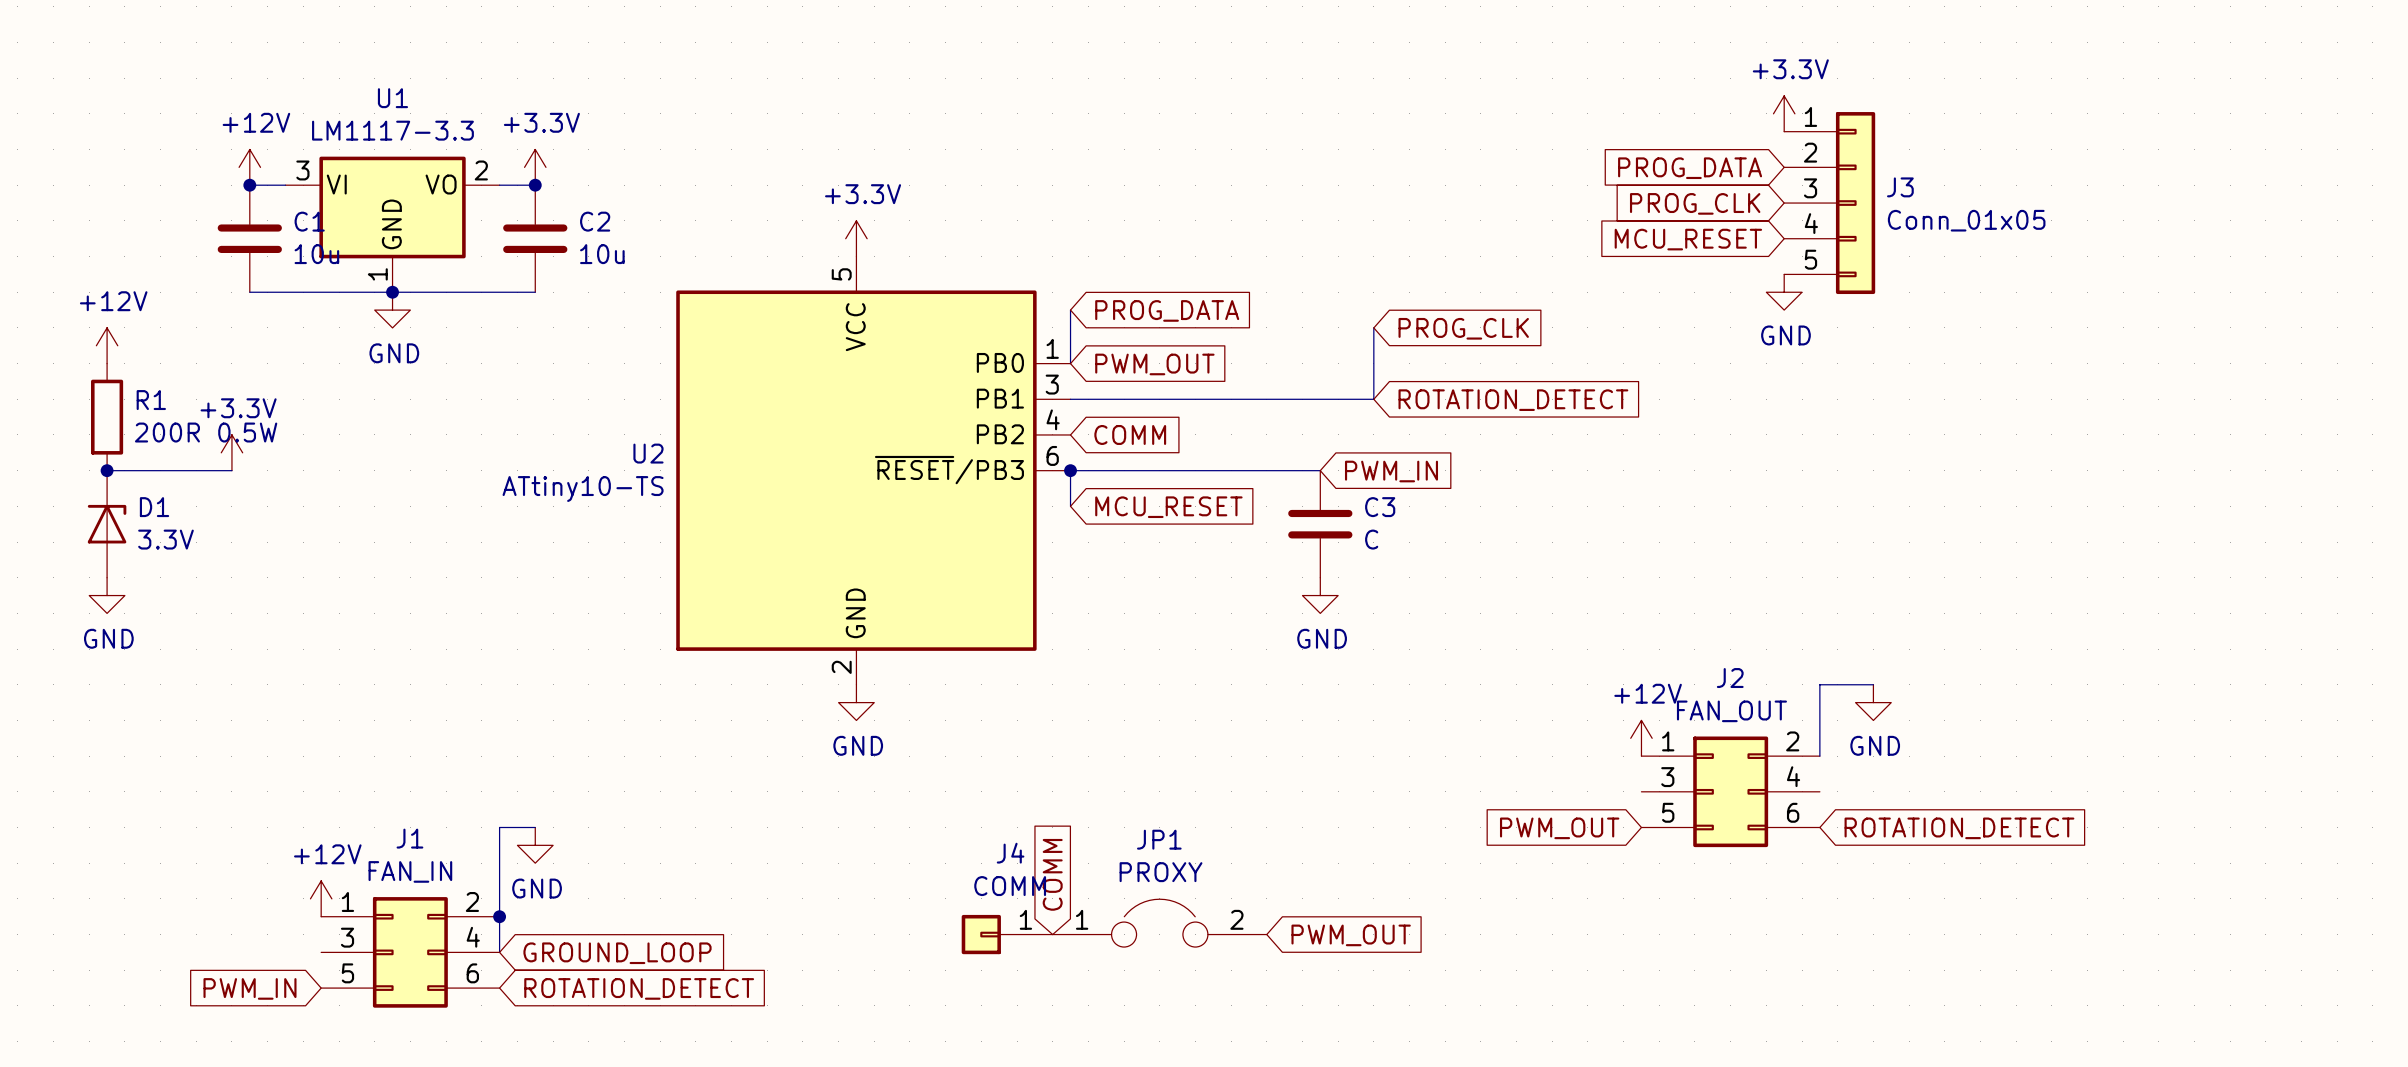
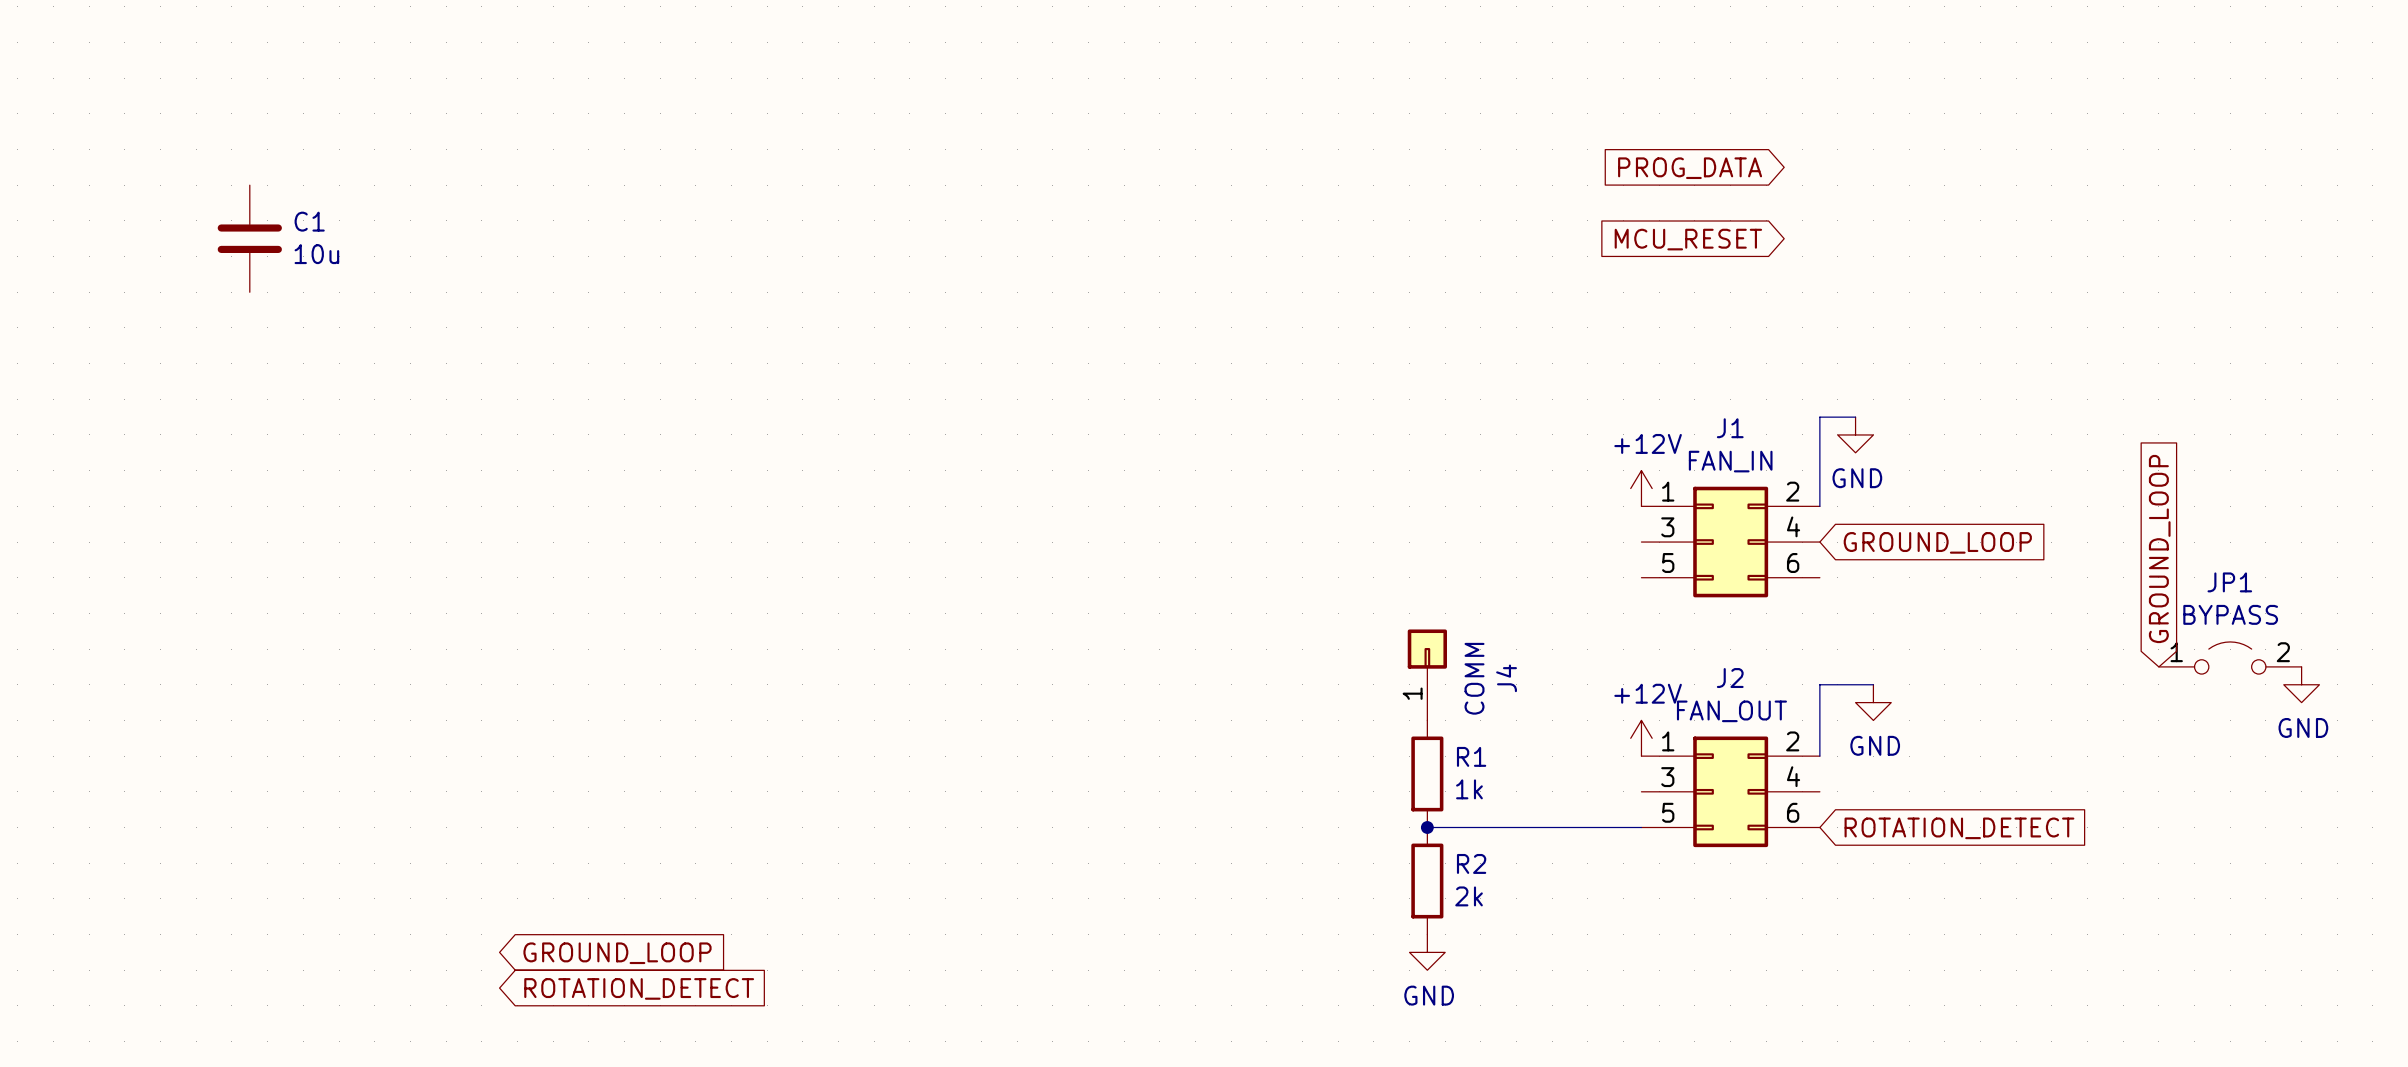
power symbol: +3.3V (1784, 113) -> none
power symbol: +12V (249, 167) -> none
power symbol: +3.3V (535, 167) -> none
wire: (249, 185) (285, 185) -> none
junction: (249, 185) -> none
wire: (499, 185) (535, 185) -> none
junction: (535, 185) -> none
global label: PROG_CLK (1695, 203) -> none
J3: Conn_01x05 (1829, 203) -> none
U1: LM1117-3.3 (392, 224) -> none
C2: 10u (535, 238) -> none
power symbol: +3.3V (856, 238) -> none
wire: (249, 292) (535, 292) -> none
junction: (392, 292) -> none
power symbol position: GND (1784, 292) -> GND (1855, 434)
power symbol: GND (392, 310) -> none
wire: (1070, 310) (1070, 363) -> none
global label: PROG_DATA (1167, 310) -> none
wire: (1373, 327) (1373, 399) (1070, 399) -> none
global label: PROG_CLK (1463, 328) -> none
power symbol: +12V (107, 345) -> none
global label: PWM_OUT (1154, 364) -> none
global label: ROTATION_DETECT (1513, 400) -> none
R1 position: (107, 417) -> (1427, 773)
wire: none -> (1855, 417) (1819, 417) (1819, 506)
R1 value: 200R 0.5W (206, 432) -> 1k (1469, 789)
global label: COMM (1130, 434) -> none
power symbol: +3.3V (231, 452) -> none
wire: (107, 470) (231, 470) -> none
junction: (107, 470) -> none
U2: ATtiny10-TS (873, 470) -> none
junction: (1070, 470) -> none
wire: (1320, 470) (1070, 470) (1070, 506) -> none
global label: PWM_IN (1391, 471) -> none
power symbol: none -> +12V (1641, 488)
global label: MCU_RESET (1168, 507) -> none
D1: 3.3V (107, 524) -> none
C3: C (1320, 524) -> none
global label: none -> GROUND_LOOP (1937, 542)
global label: none -> GROUND_LOOP (2159, 549)
power symbol: GND (107, 595) -> none
power symbol: GND (1320, 595) -> none
power symbol: none -> GND (2301, 684)
power symbol: GND (856, 702) -> none
wire: (535, 827) (499, 827) (499, 952) -> none
wire: none -> (1427, 827) (1641, 827)
junction: none -> (1427, 827)
global label: PWM_OUT (1559, 828) -> none
power symbol: GND (535, 845) -> none
JP1 value: PROXY (1161, 872) -> BYPASS (2230, 614)
global label: COMM (1052, 874) -> none
R2: none -> 2k (1427, 881)
power symbol: +12V (321, 898) -> none
JP1 symbol: [1052, 899, 1267, 948] -> [2158, 641, 2302, 675]
junction: (499, 916) -> none
J4 rotation: 0° (981, 934) -> 90° clockwise (1427, 649)
J4 position: (1007, 934) -> (1427, 674)
global label: PWM_OUT (1351, 935) -> none
J1 position: (410, 952) -> (1730, 542)
power symbol: none -> GND (1427, 952)
global label: PWM_IN (249, 988) -> none

